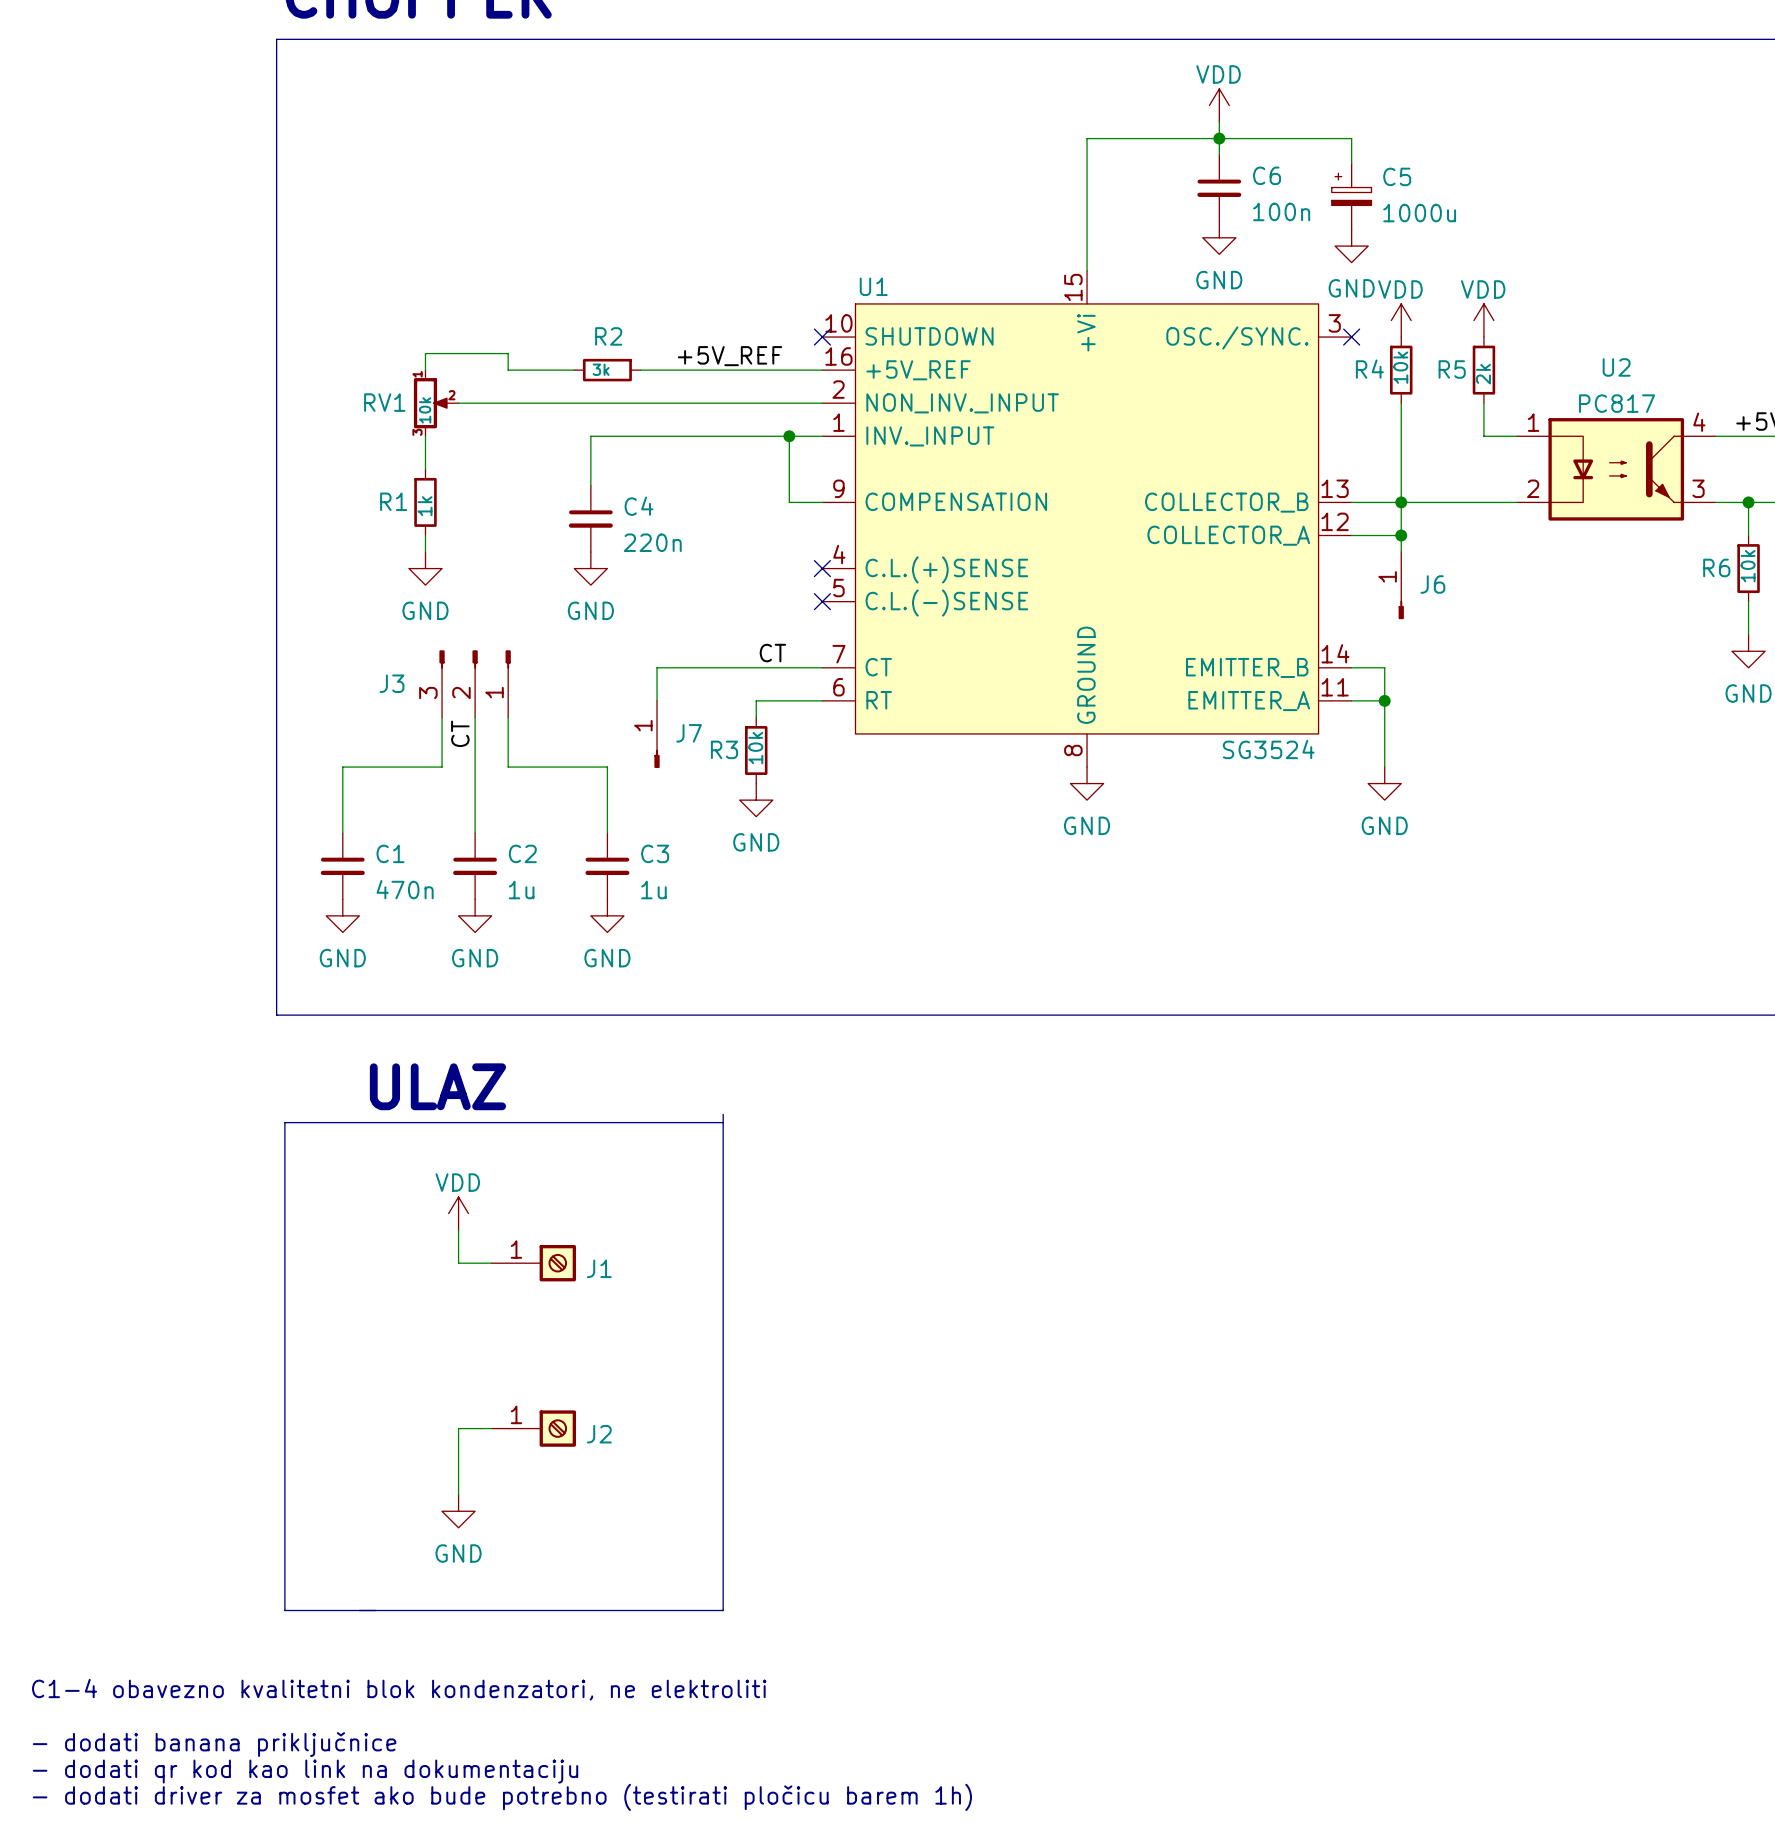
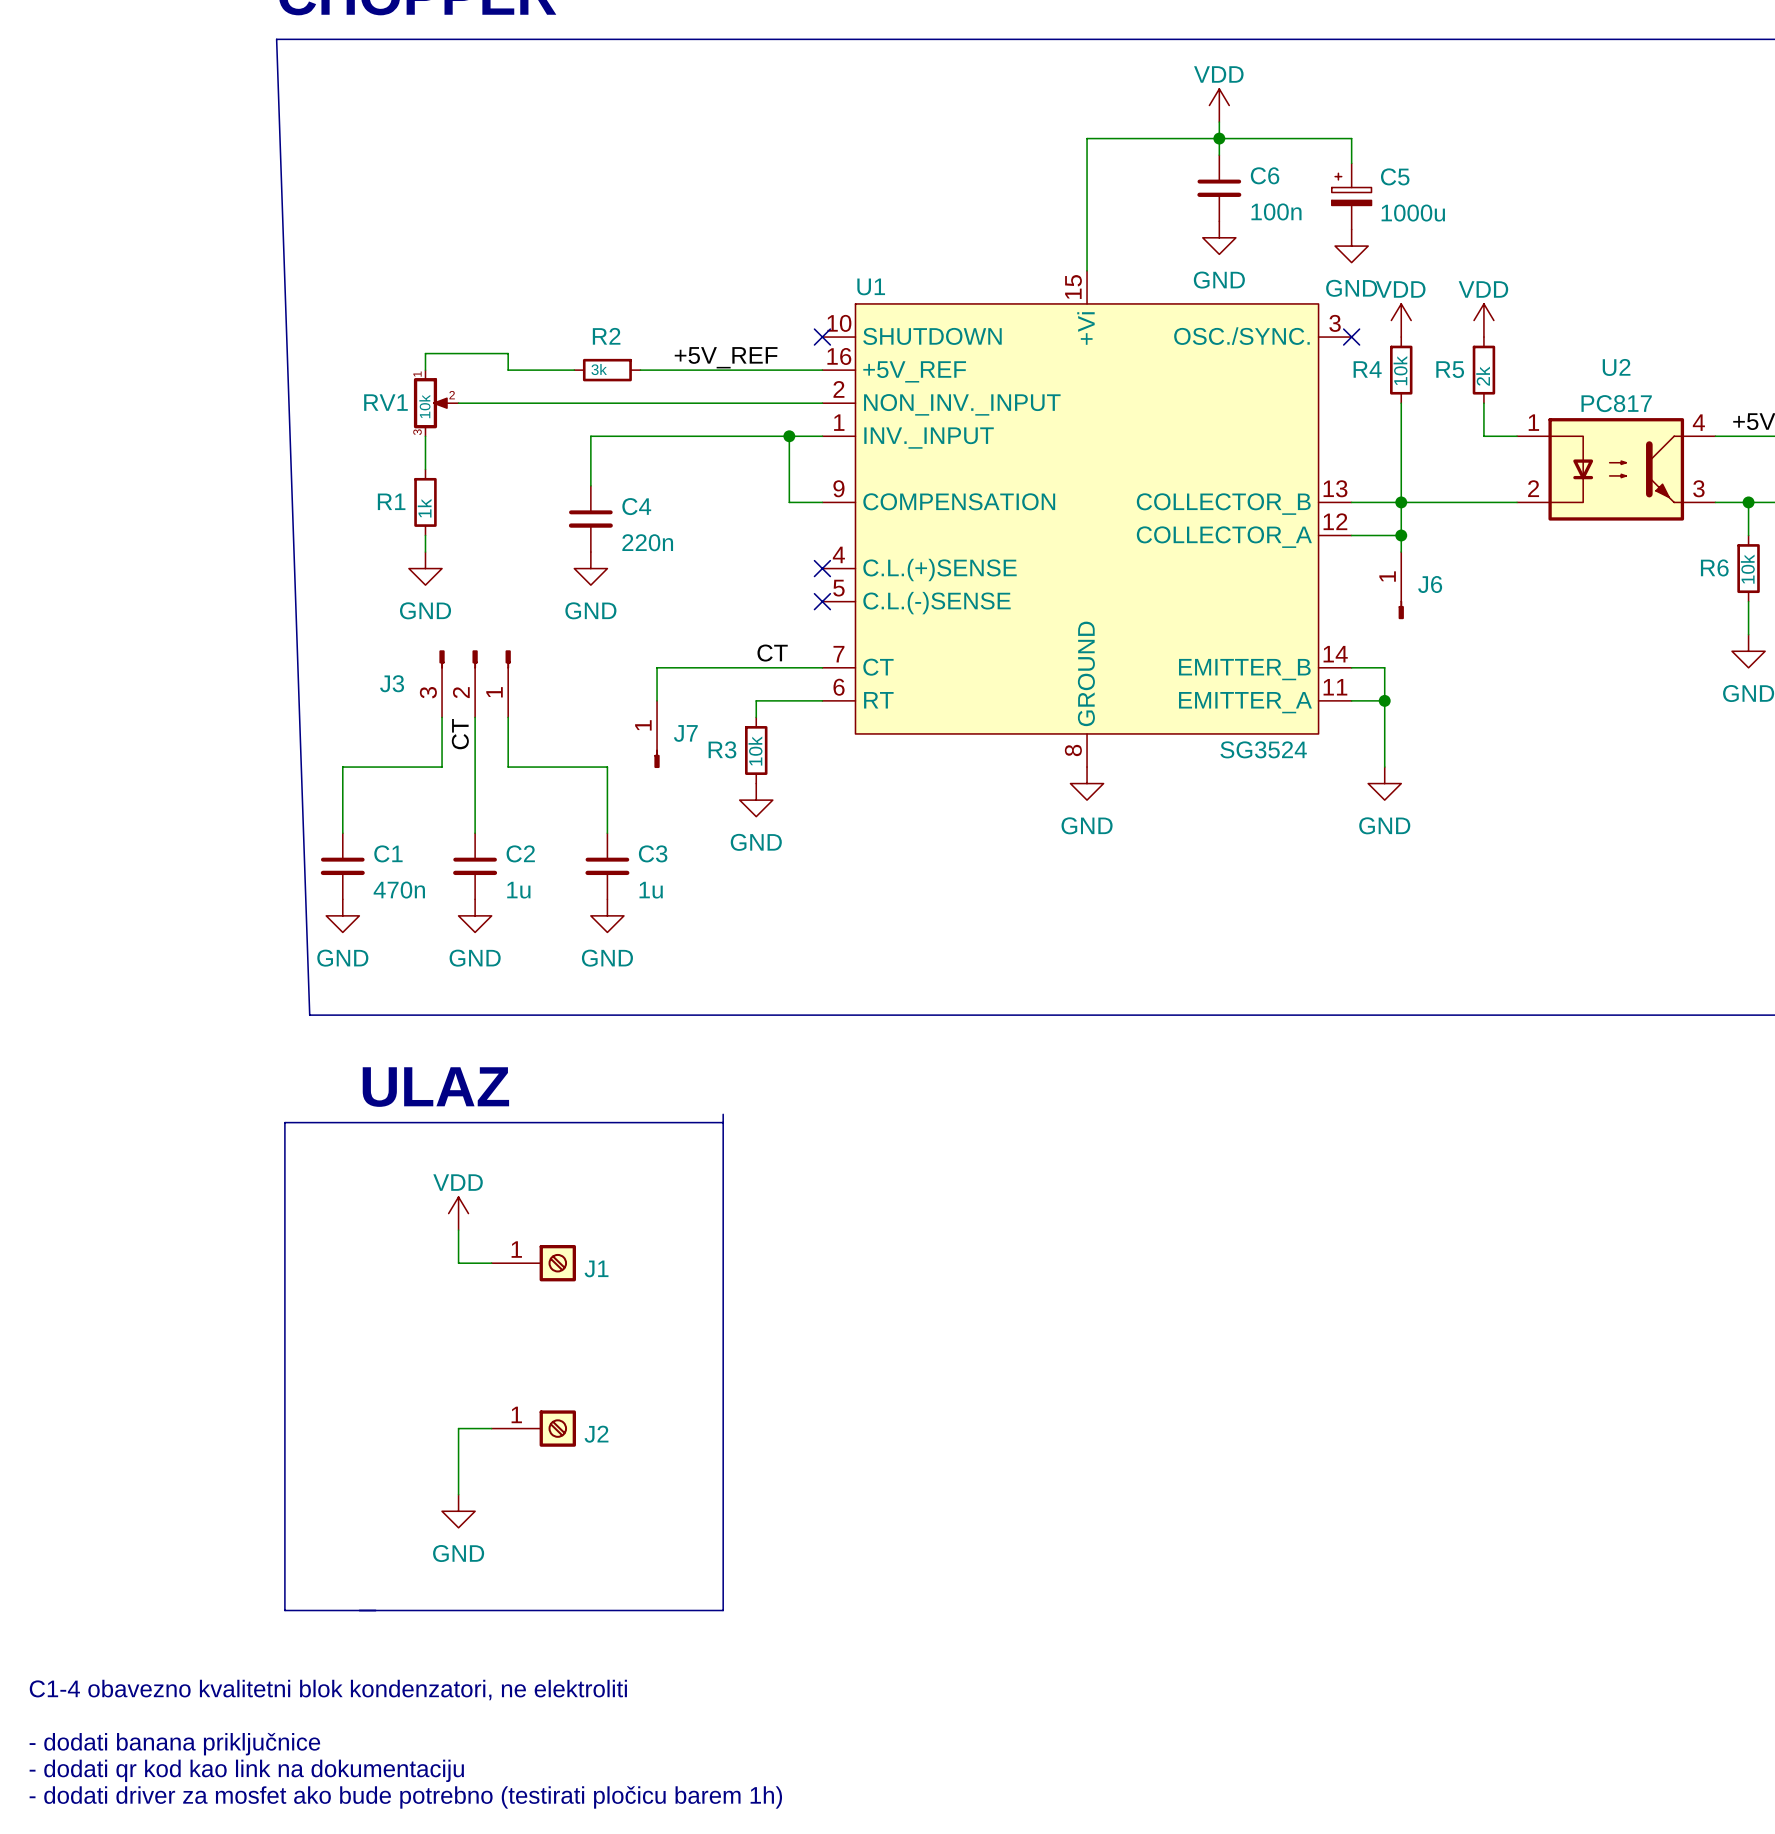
line: (276, 39) (276, 1015) (309, 1015) -> (276, 39) (309, 1015)

